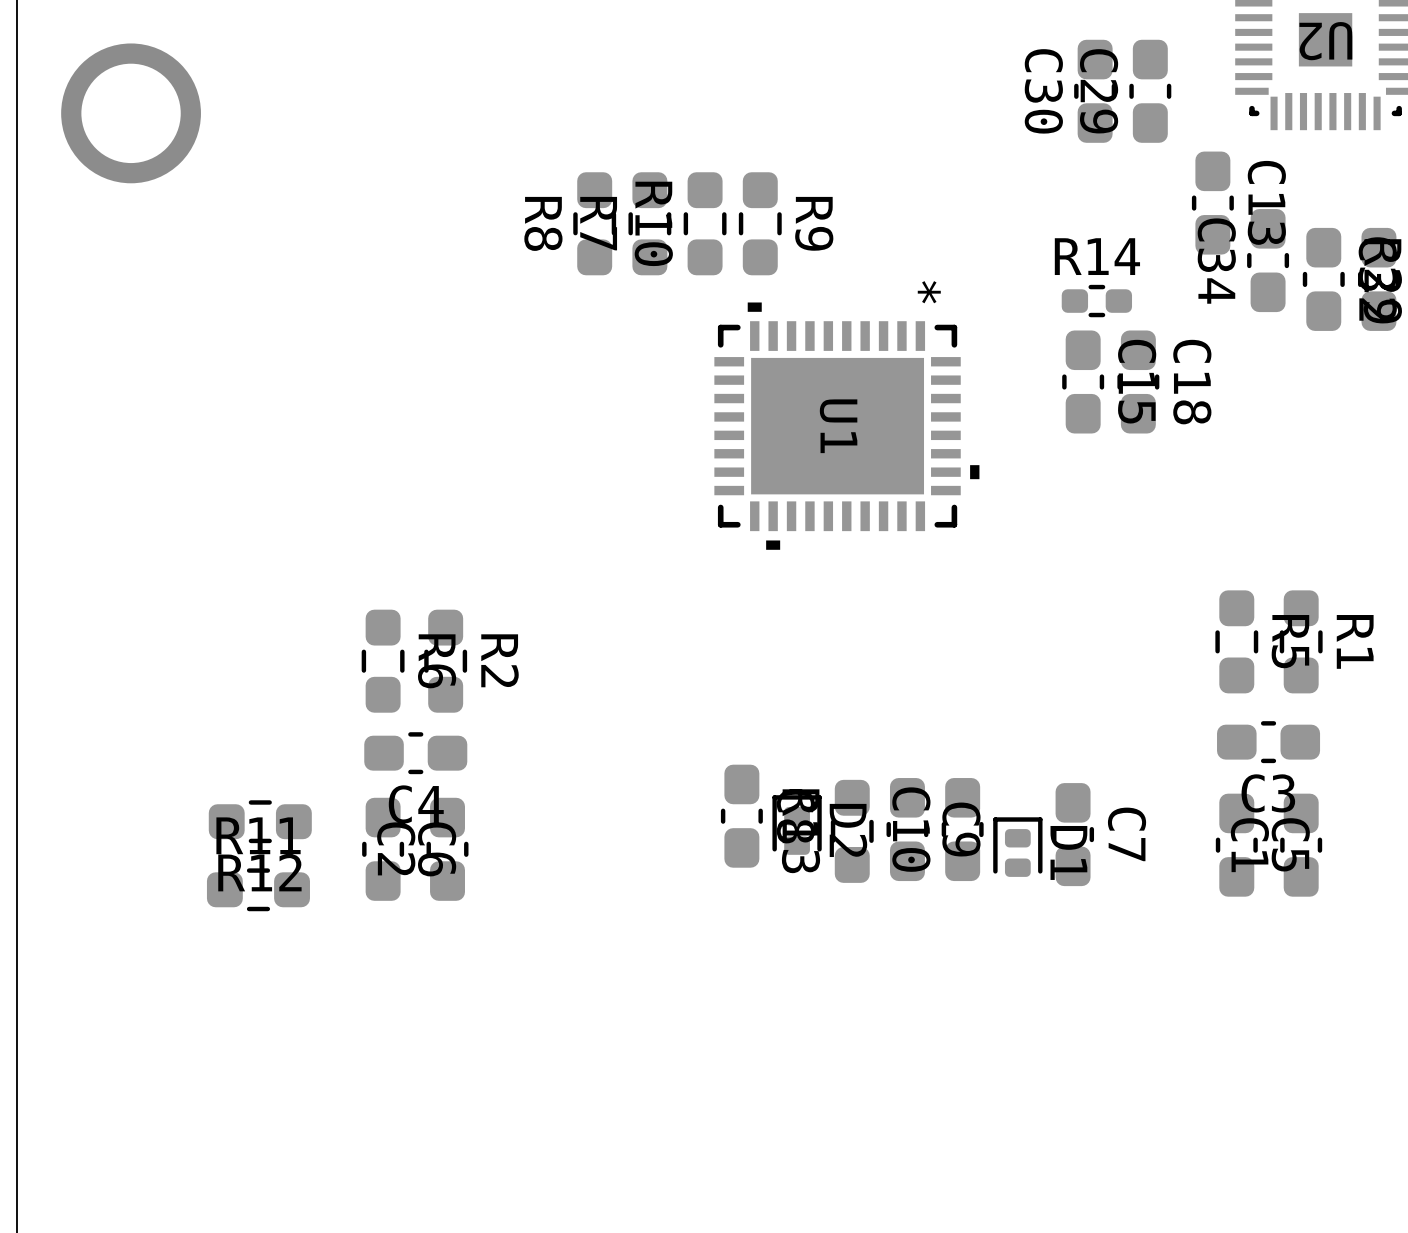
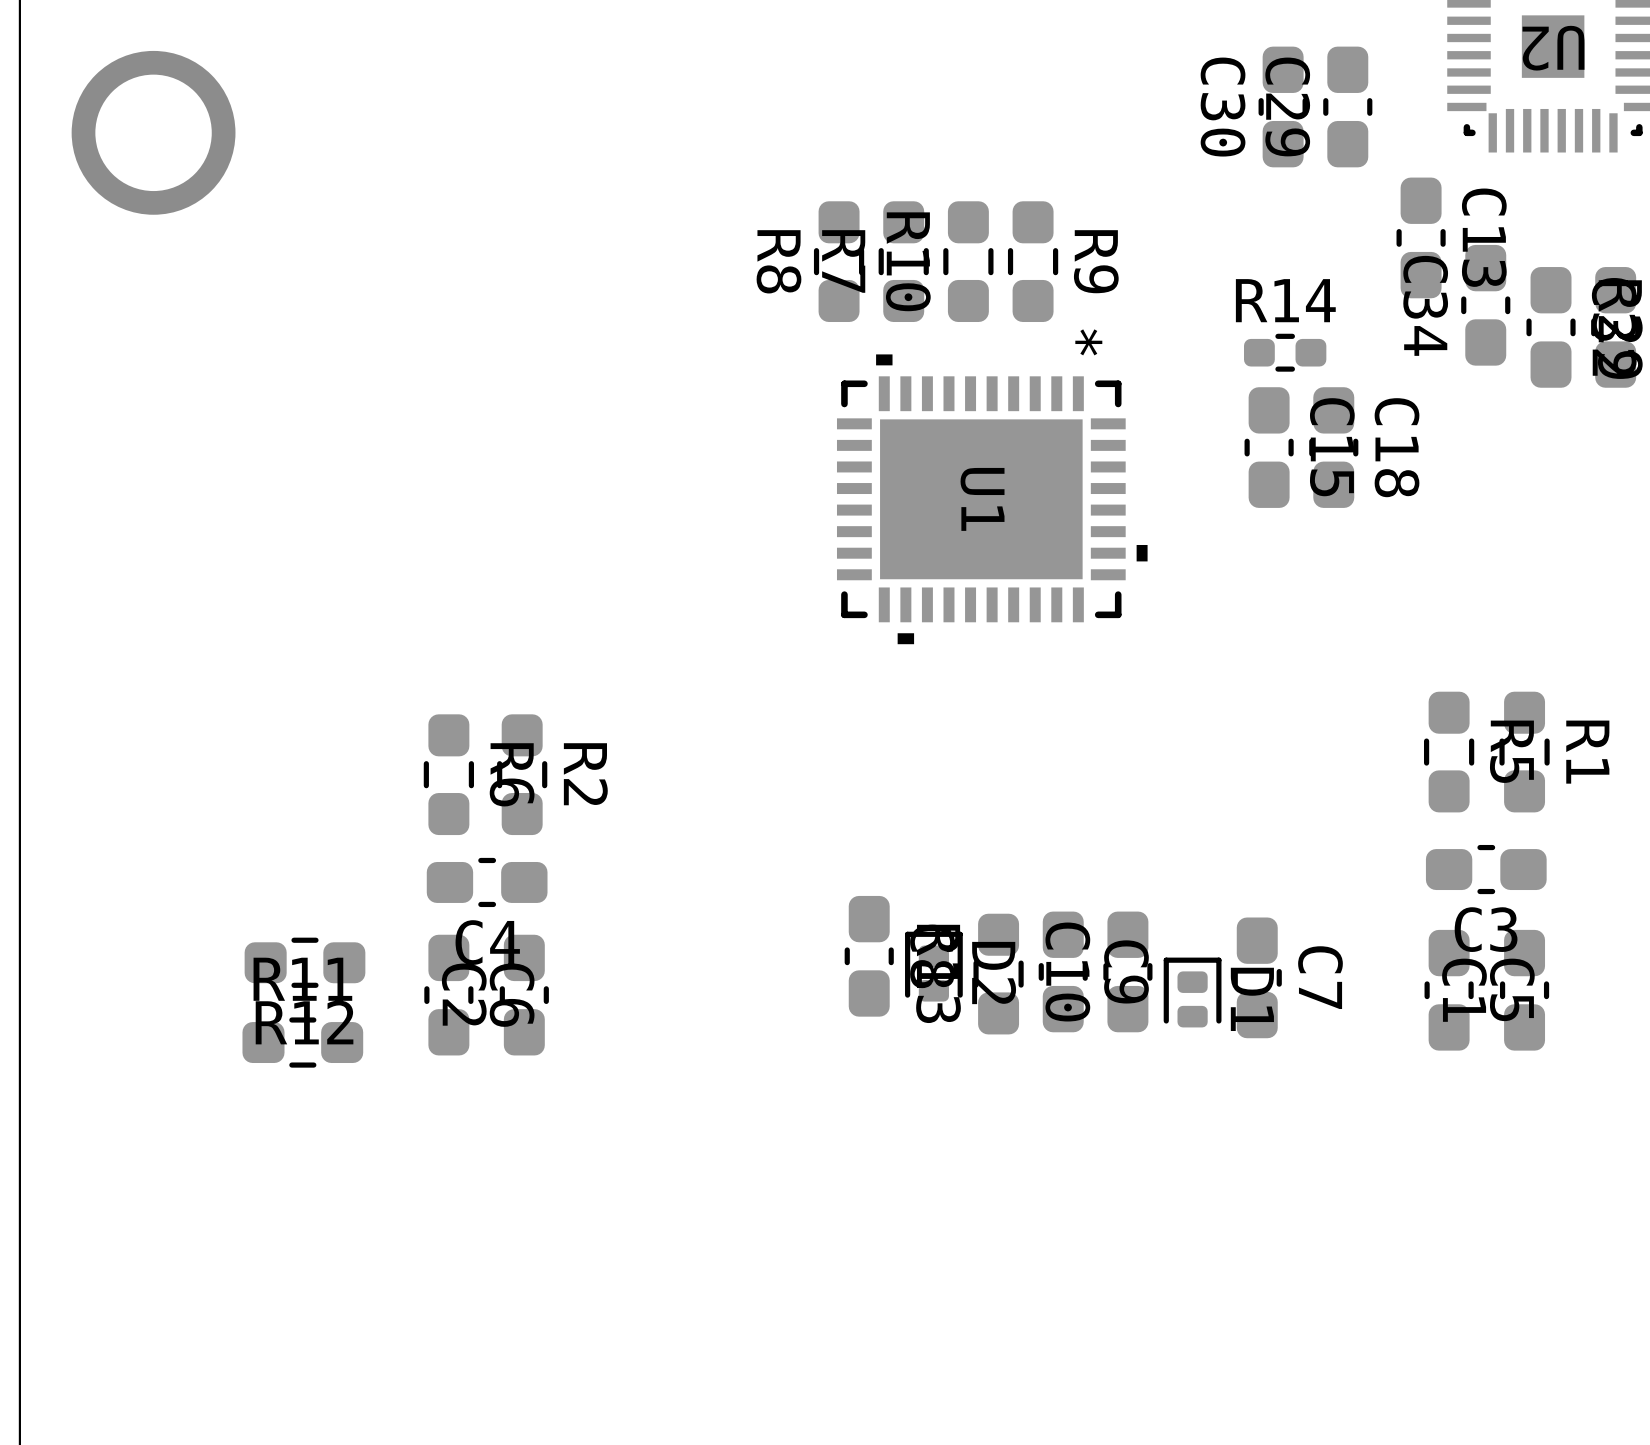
R8 position: (594, 223) -> (839, 261)
R7 position: (649, 223) -> (903, 261)
R10 position: (705, 223) -> (968, 261)
R9 position: (760, 223) -> (1033, 261)

